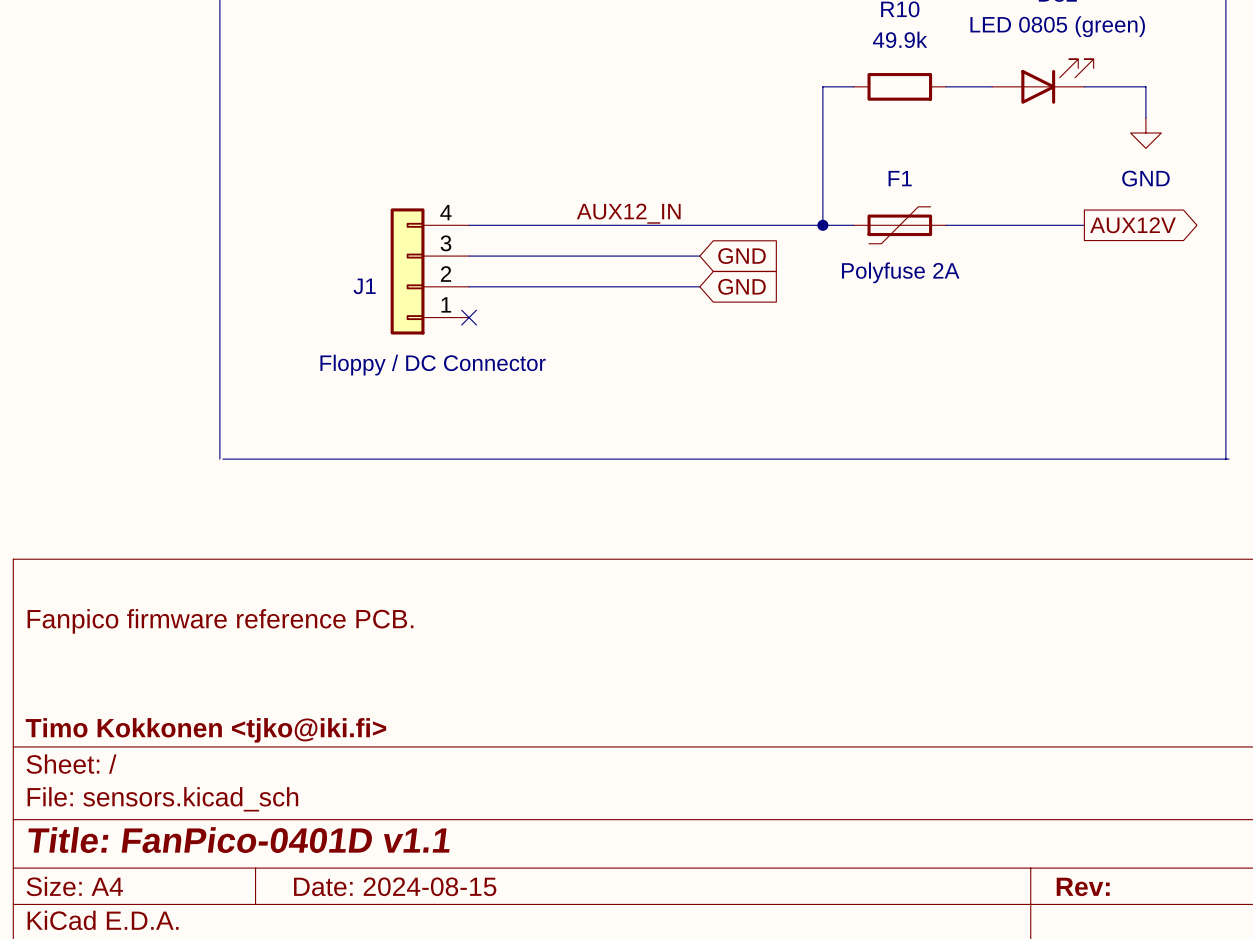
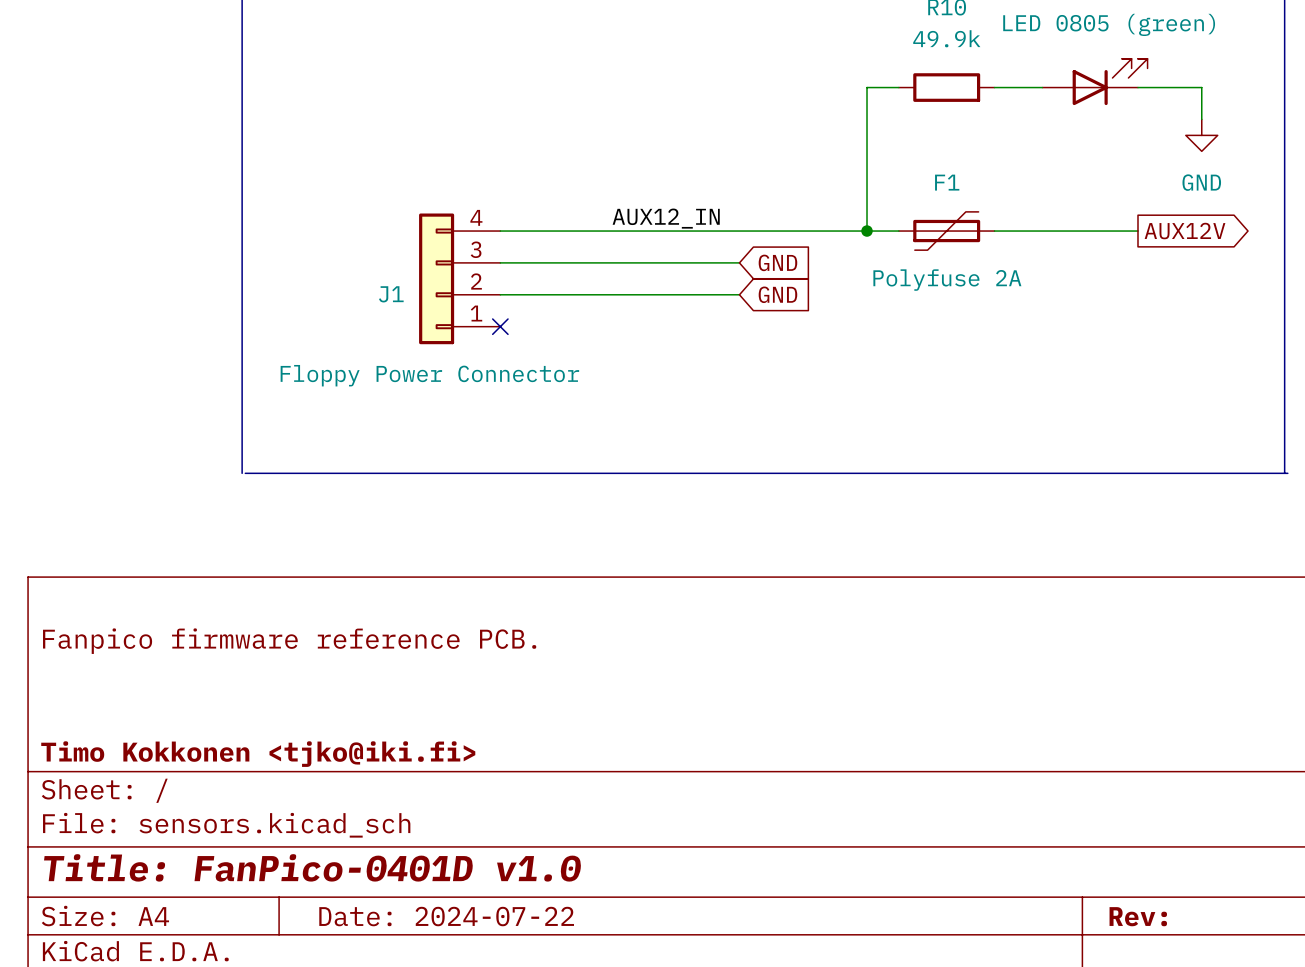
J1 value: Floppy / DC Connector (433, 365) -> Floppy Power Connector (429, 375)
title block: Title: FanPico-0401D v1.1 (238, 840) -> Title: FanPico-0401D v1.0 (312, 867)
title block: Date: 2024-08-15 (395, 886) -> Date: 2024-07-22 (446, 916)

